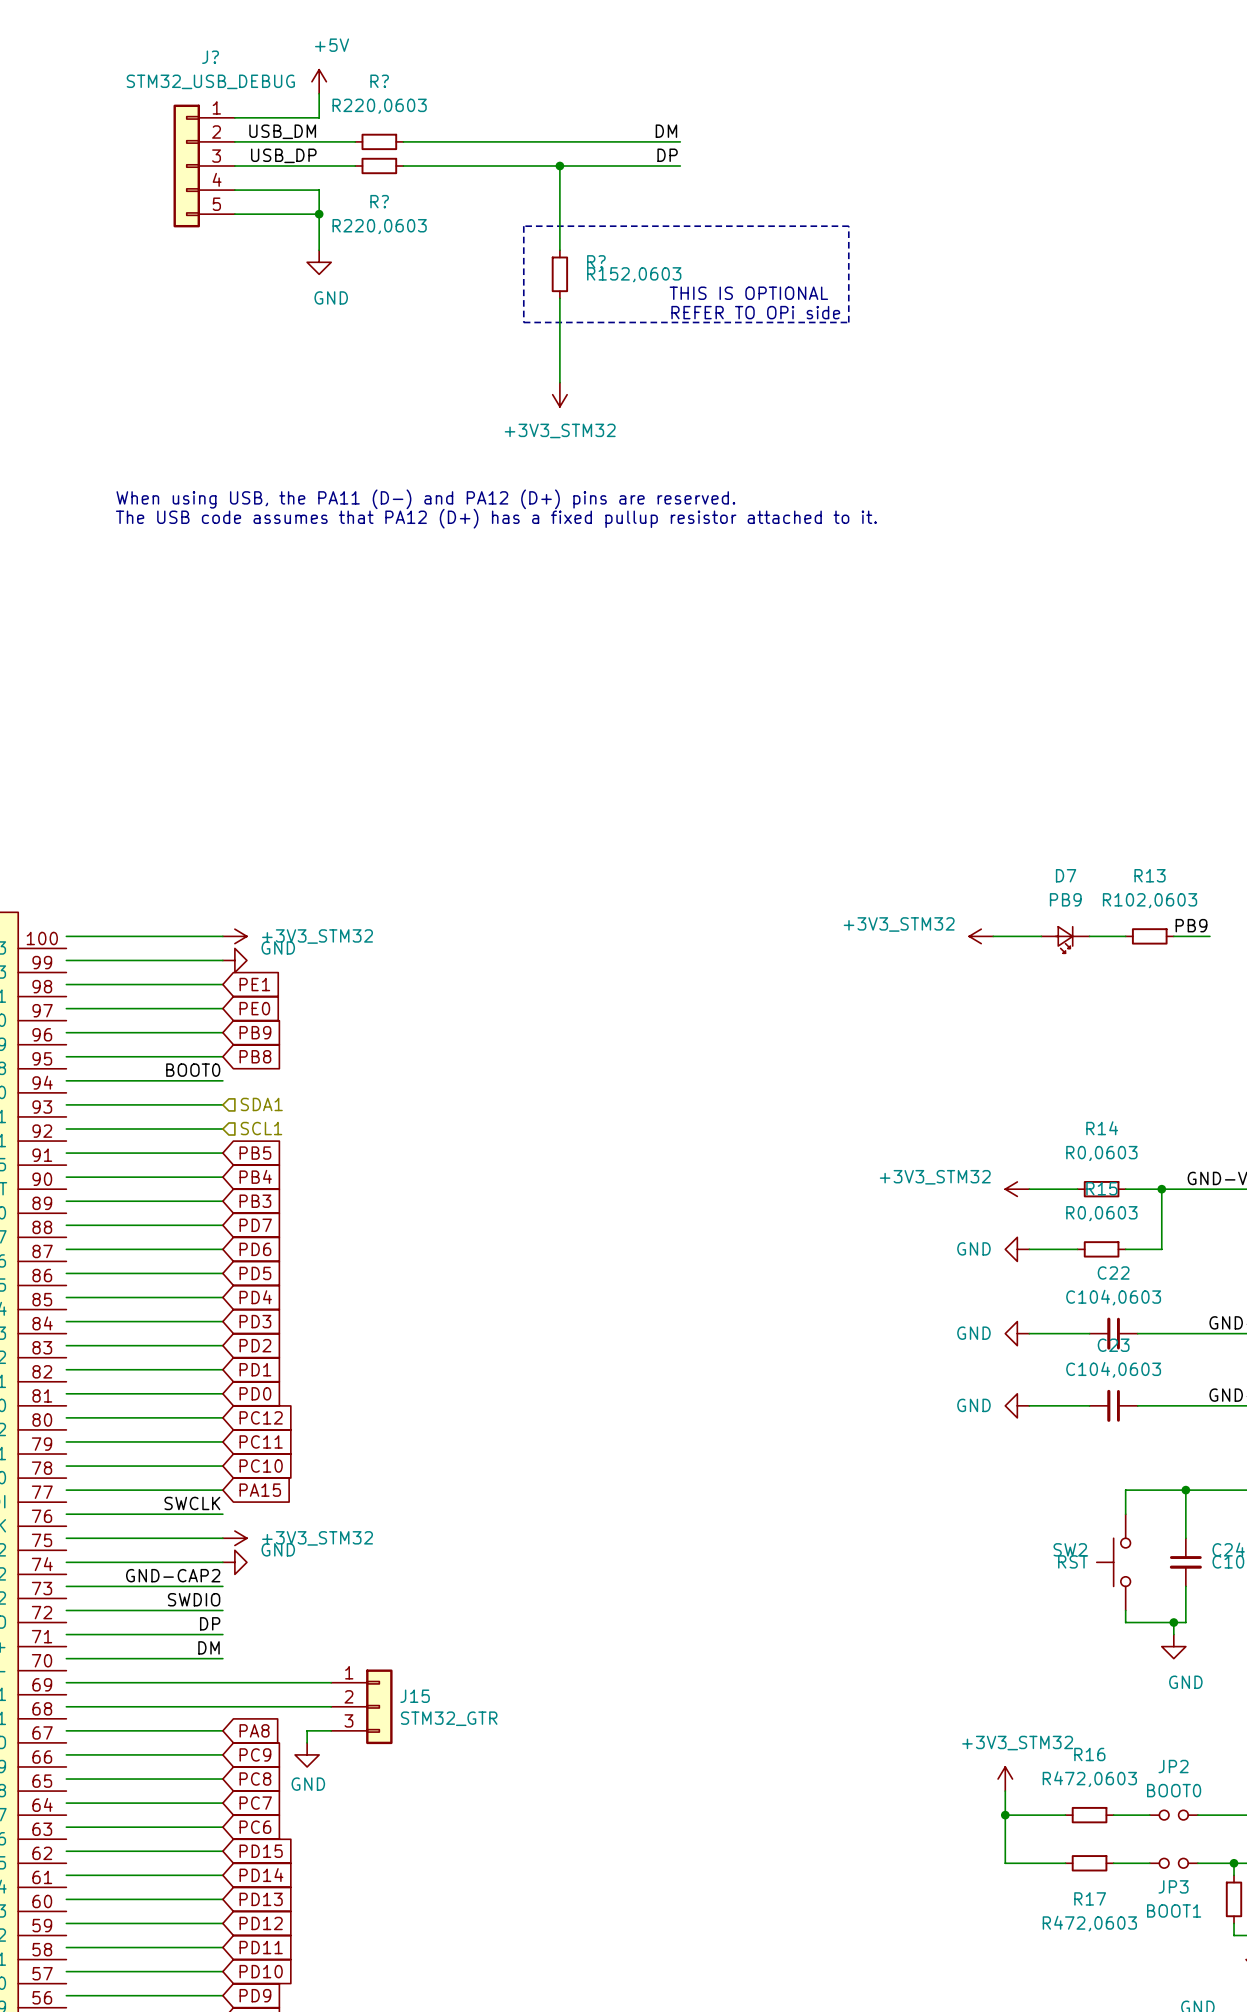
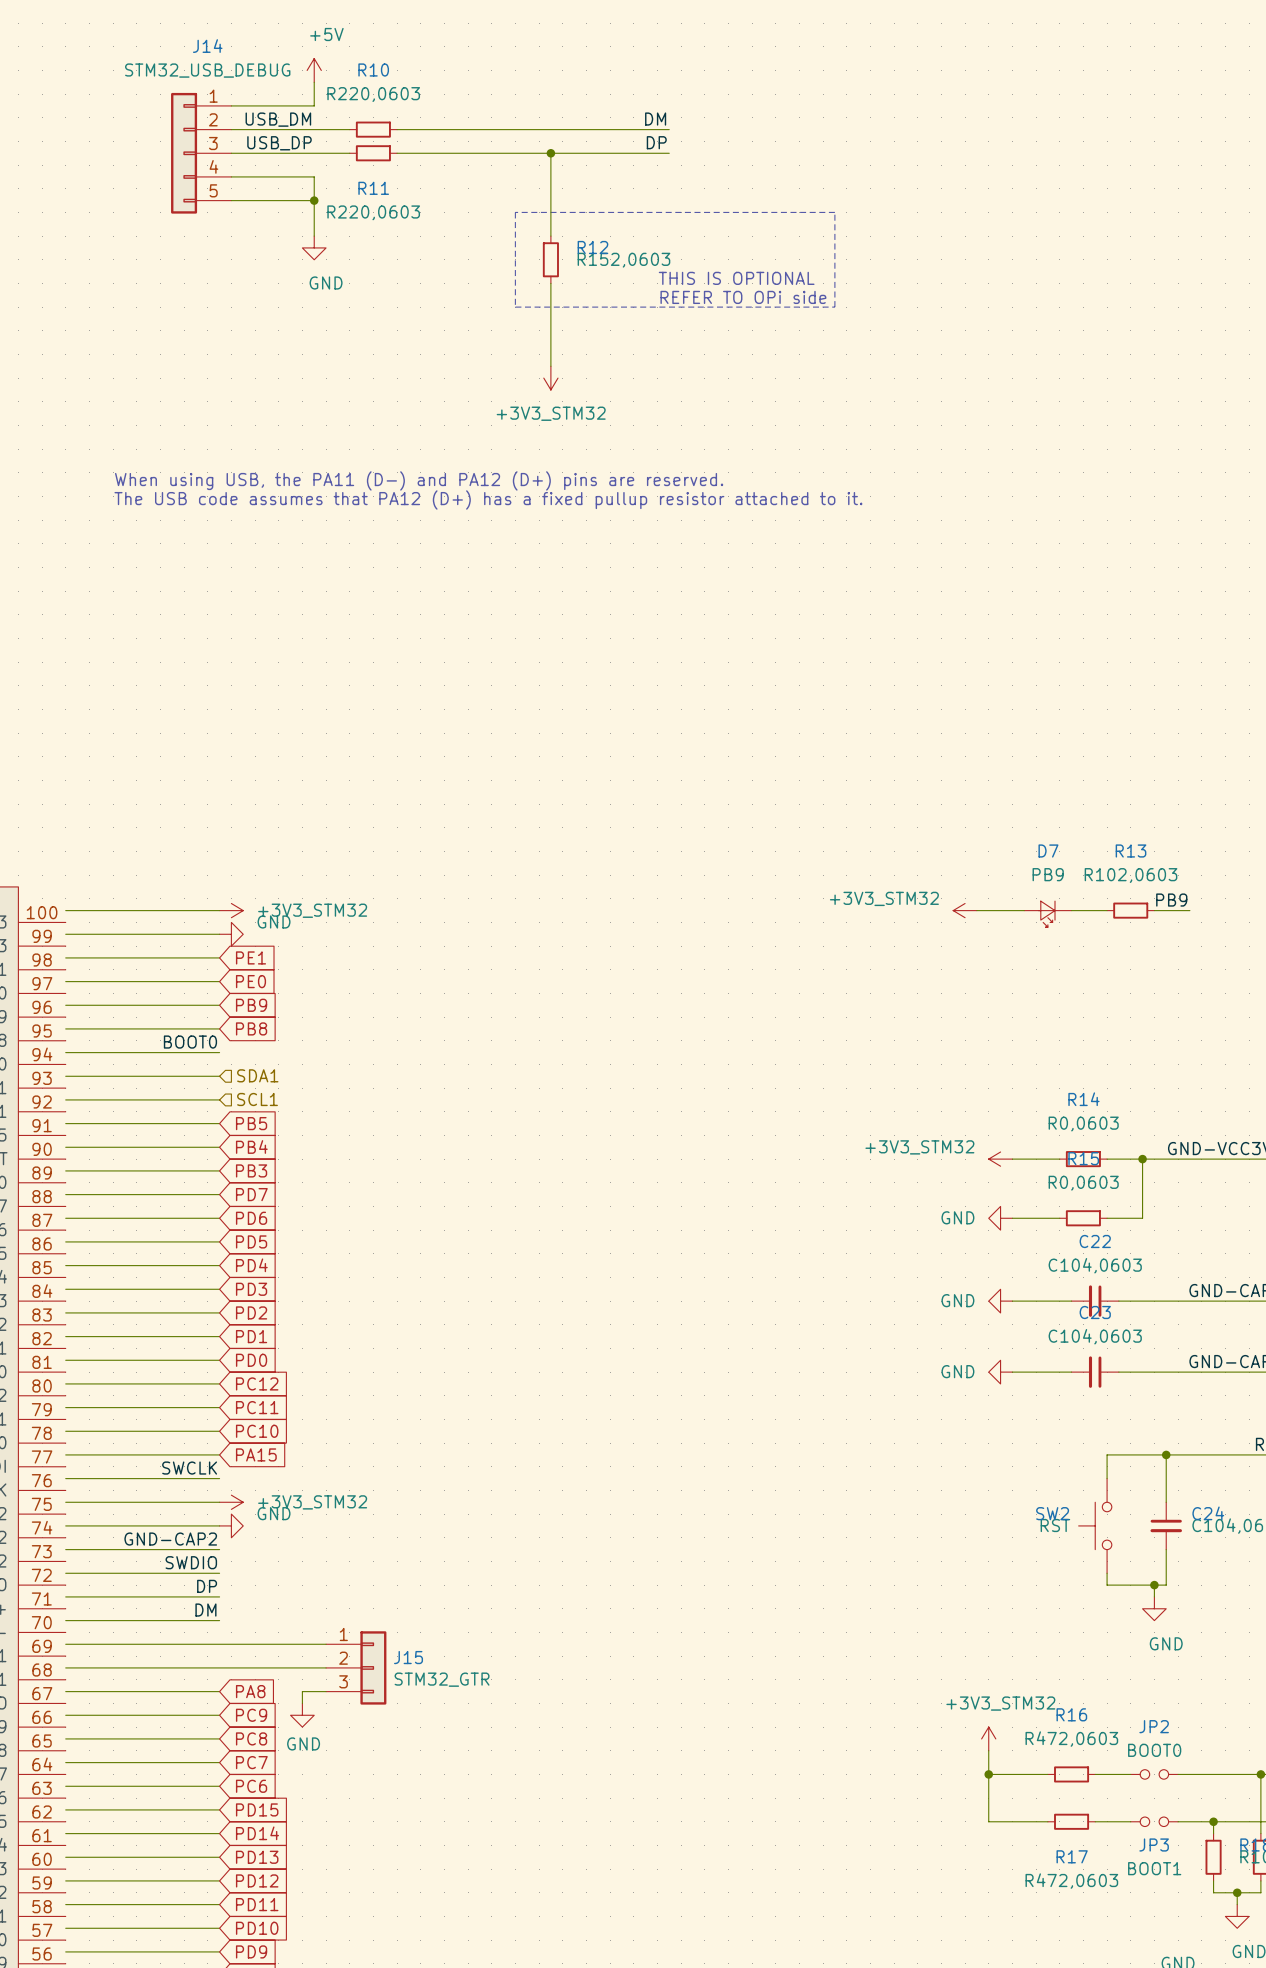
J? name: J? (210, 57) -> J14 (207, 46)
R? name: R? (379, 81) -> R10 (373, 70)
R? name: R? (379, 201) -> R11 (373, 188)
R? name: R? (596, 261) -> R12 (592, 247)

